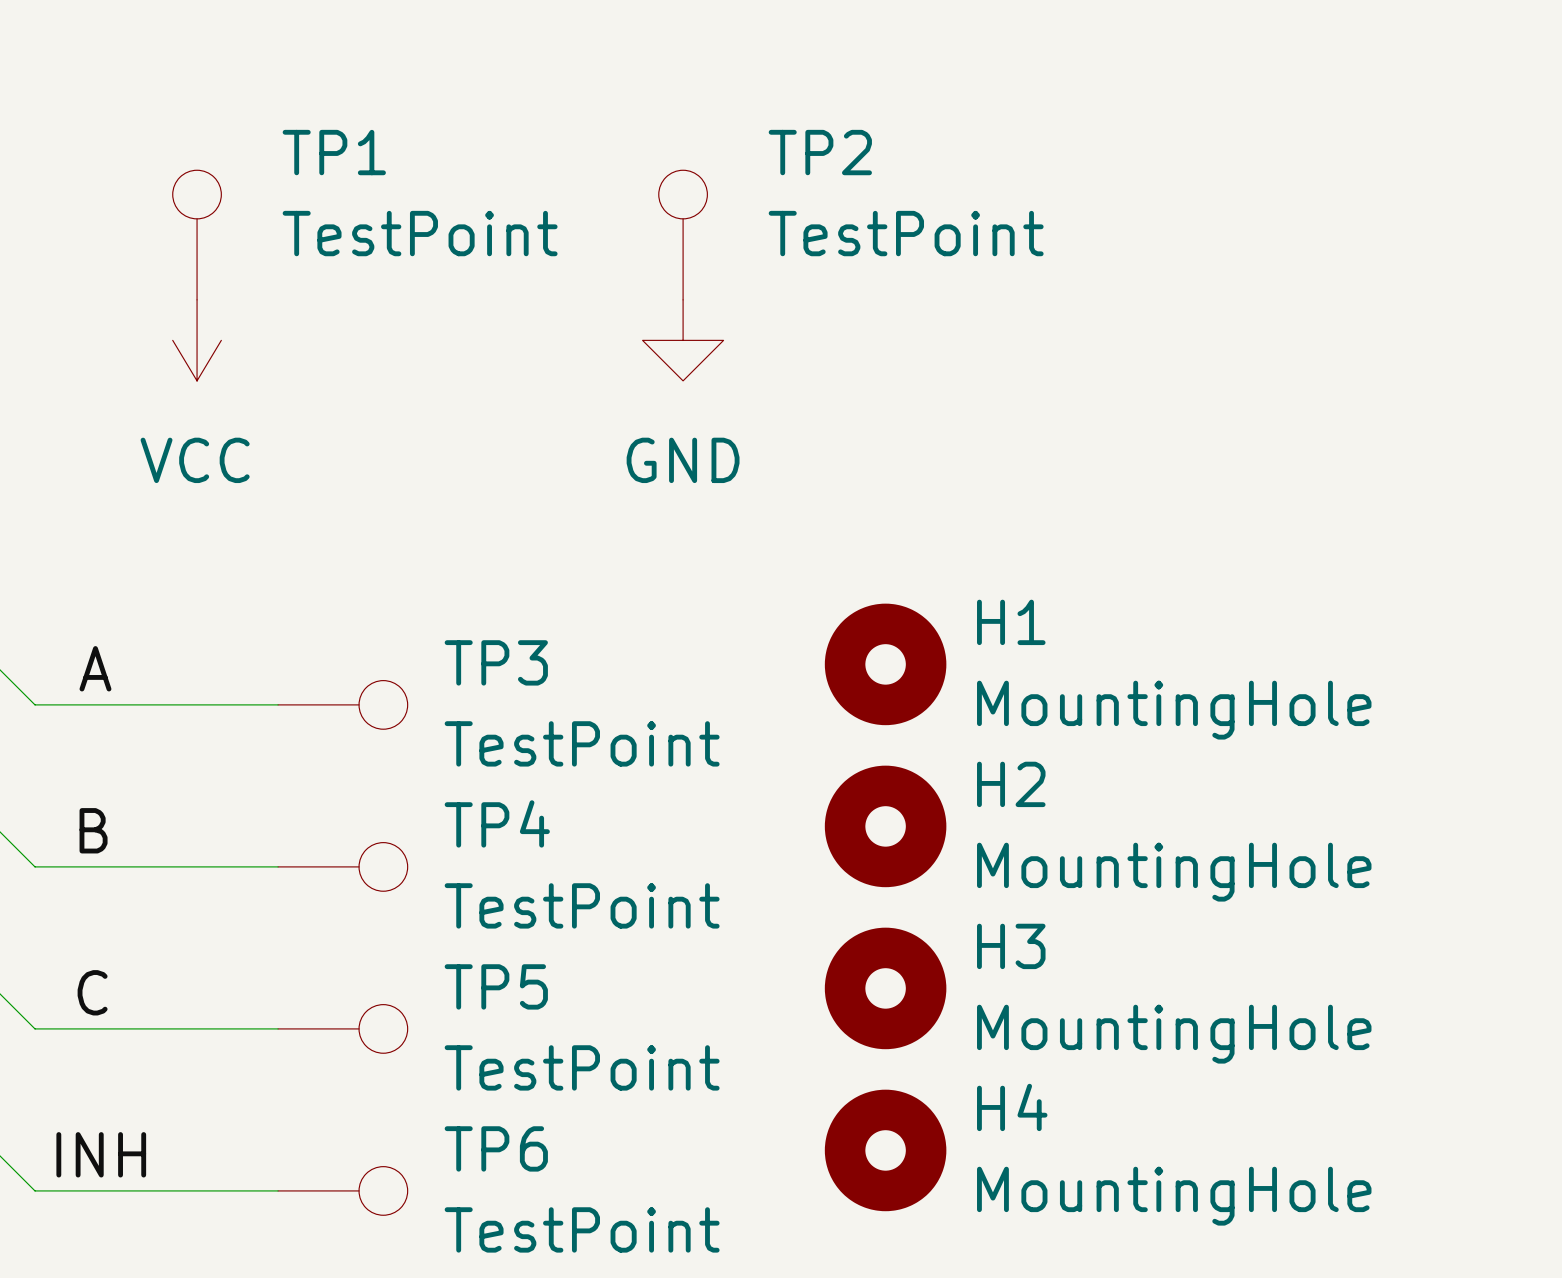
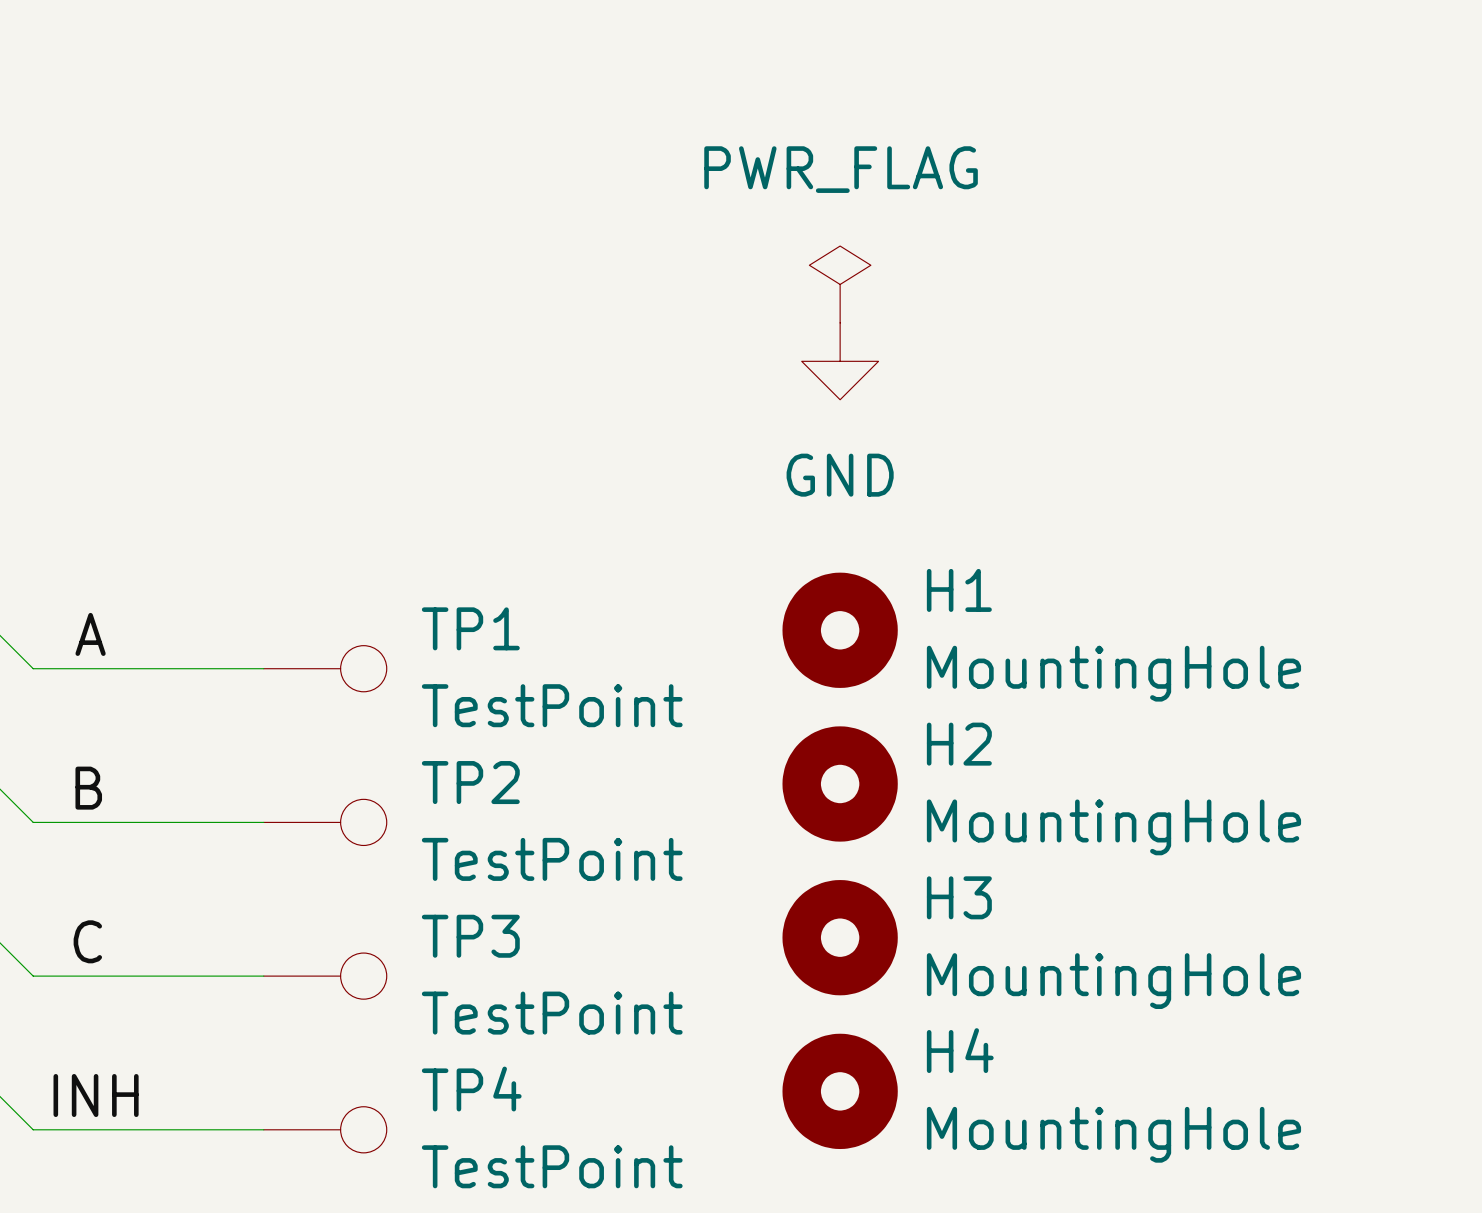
TP1: TestPoint (197, 235) -> none
TP2: TestPoint (683, 235) -> none
power symbol: none -> PWR_FLAG (840, 284)
power symbol: VCC (197, 340) -> none
power symbol position: GND (683, 340) -> GND (840, 361)
TP3 name: TP3 (496, 662) -> TP1 (470, 628)
TP4 name: TP4 (497, 823) -> TP2 (470, 782)
TP5 name: TP5 (496, 986) -> TP3 (470, 936)
TP6 name: TP6 (496, 1148) -> TP4 (471, 1089)

